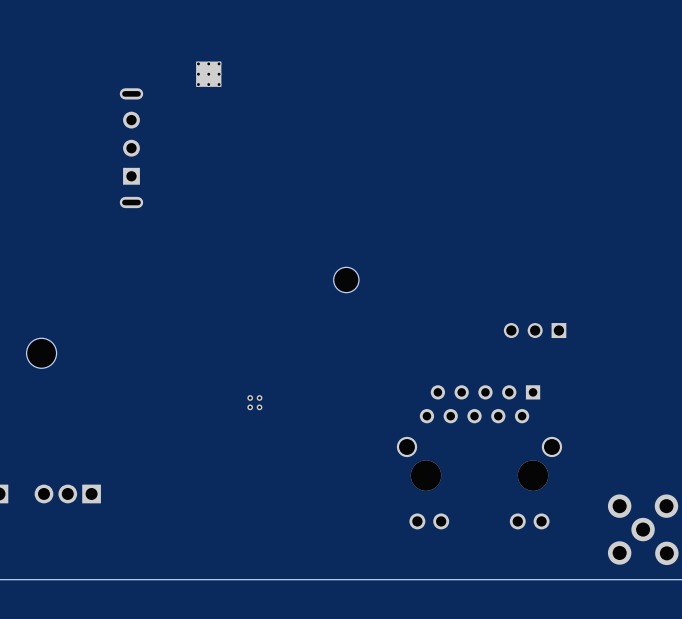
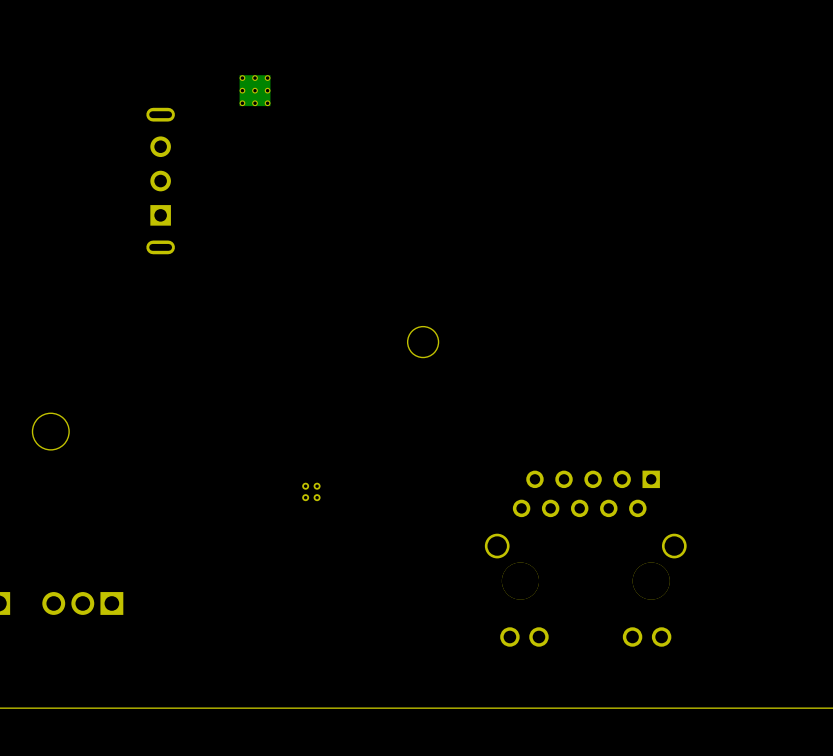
part: (535, 330) -> none
part: (643, 529) -> none

